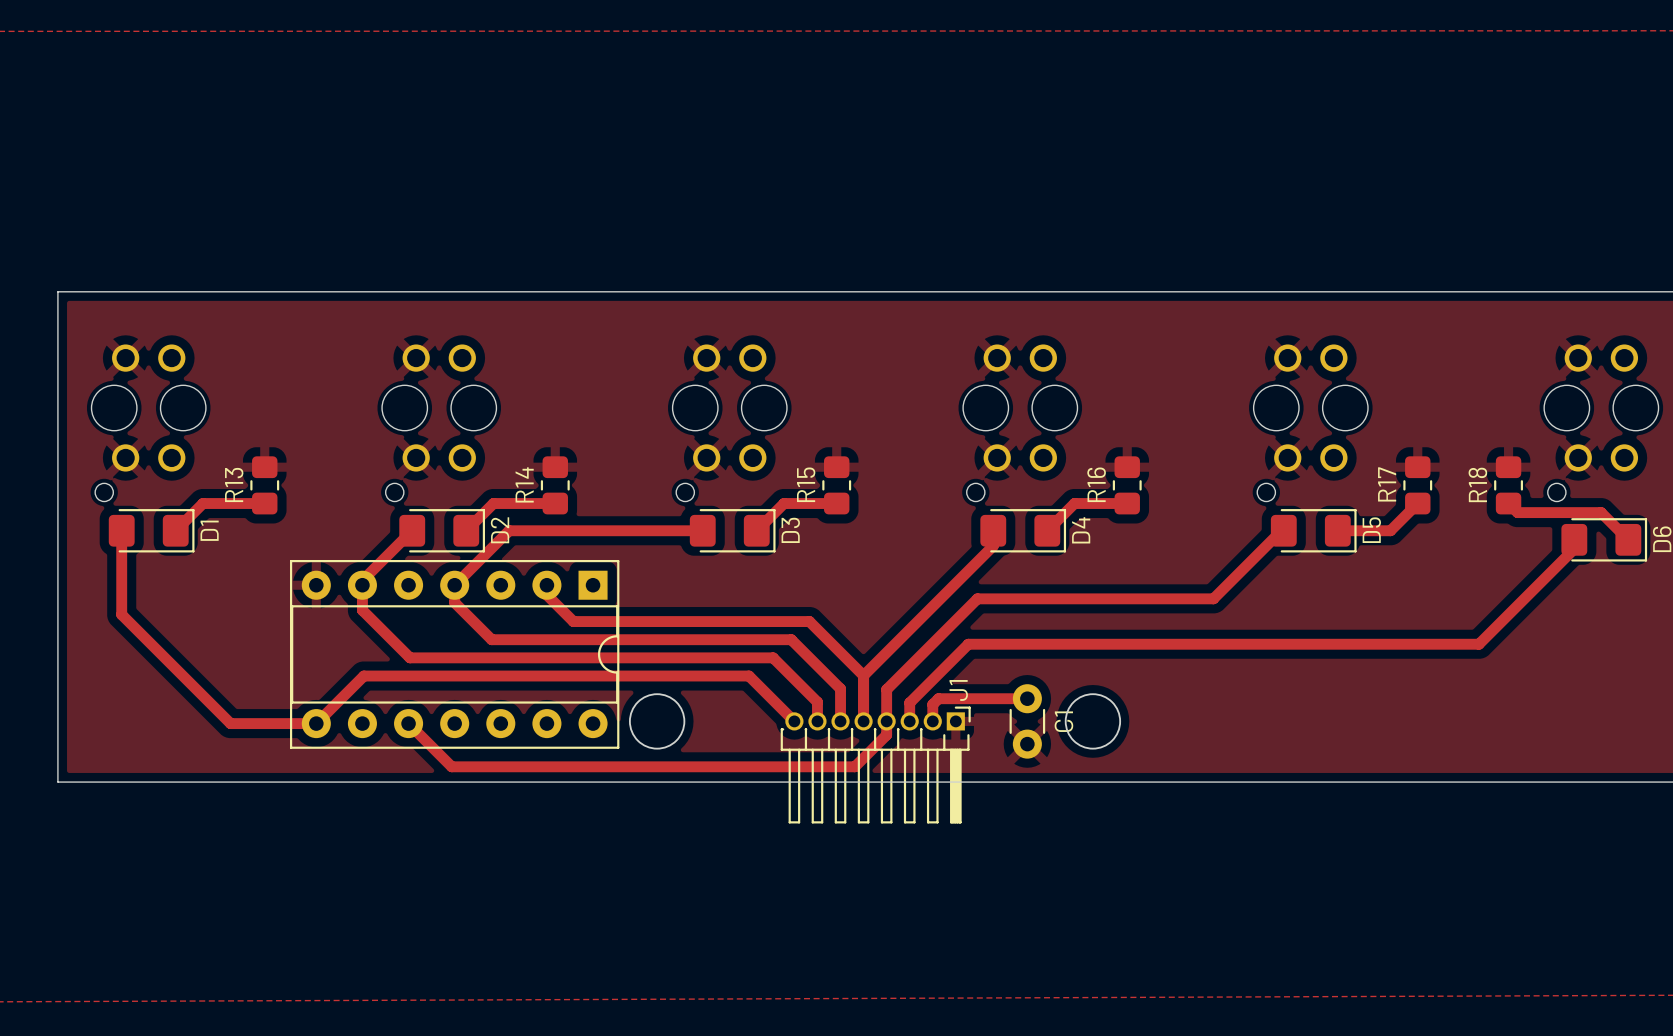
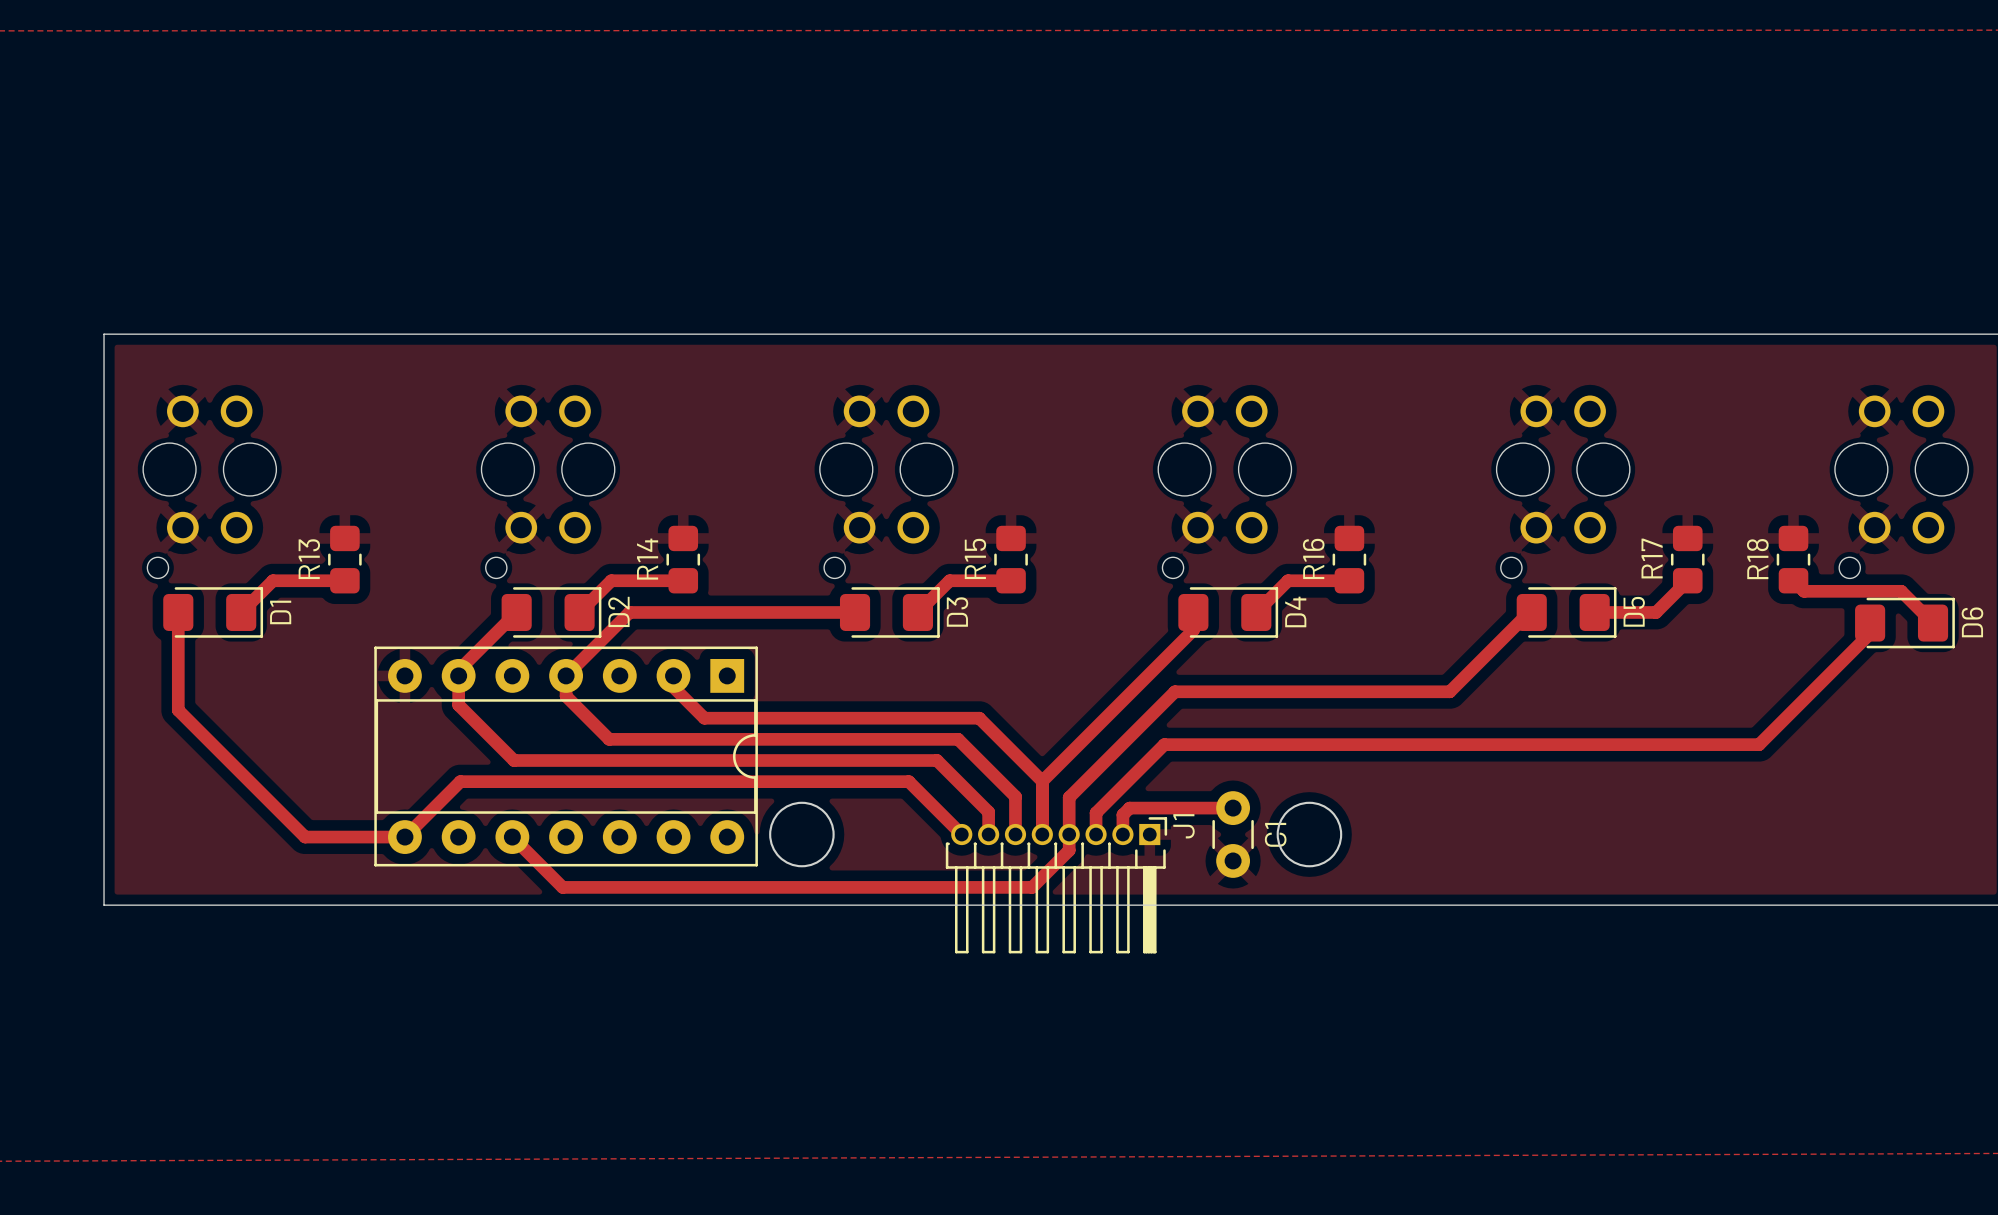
J1 name position: J1 (958, 690) -> J1 (1183, 826)

